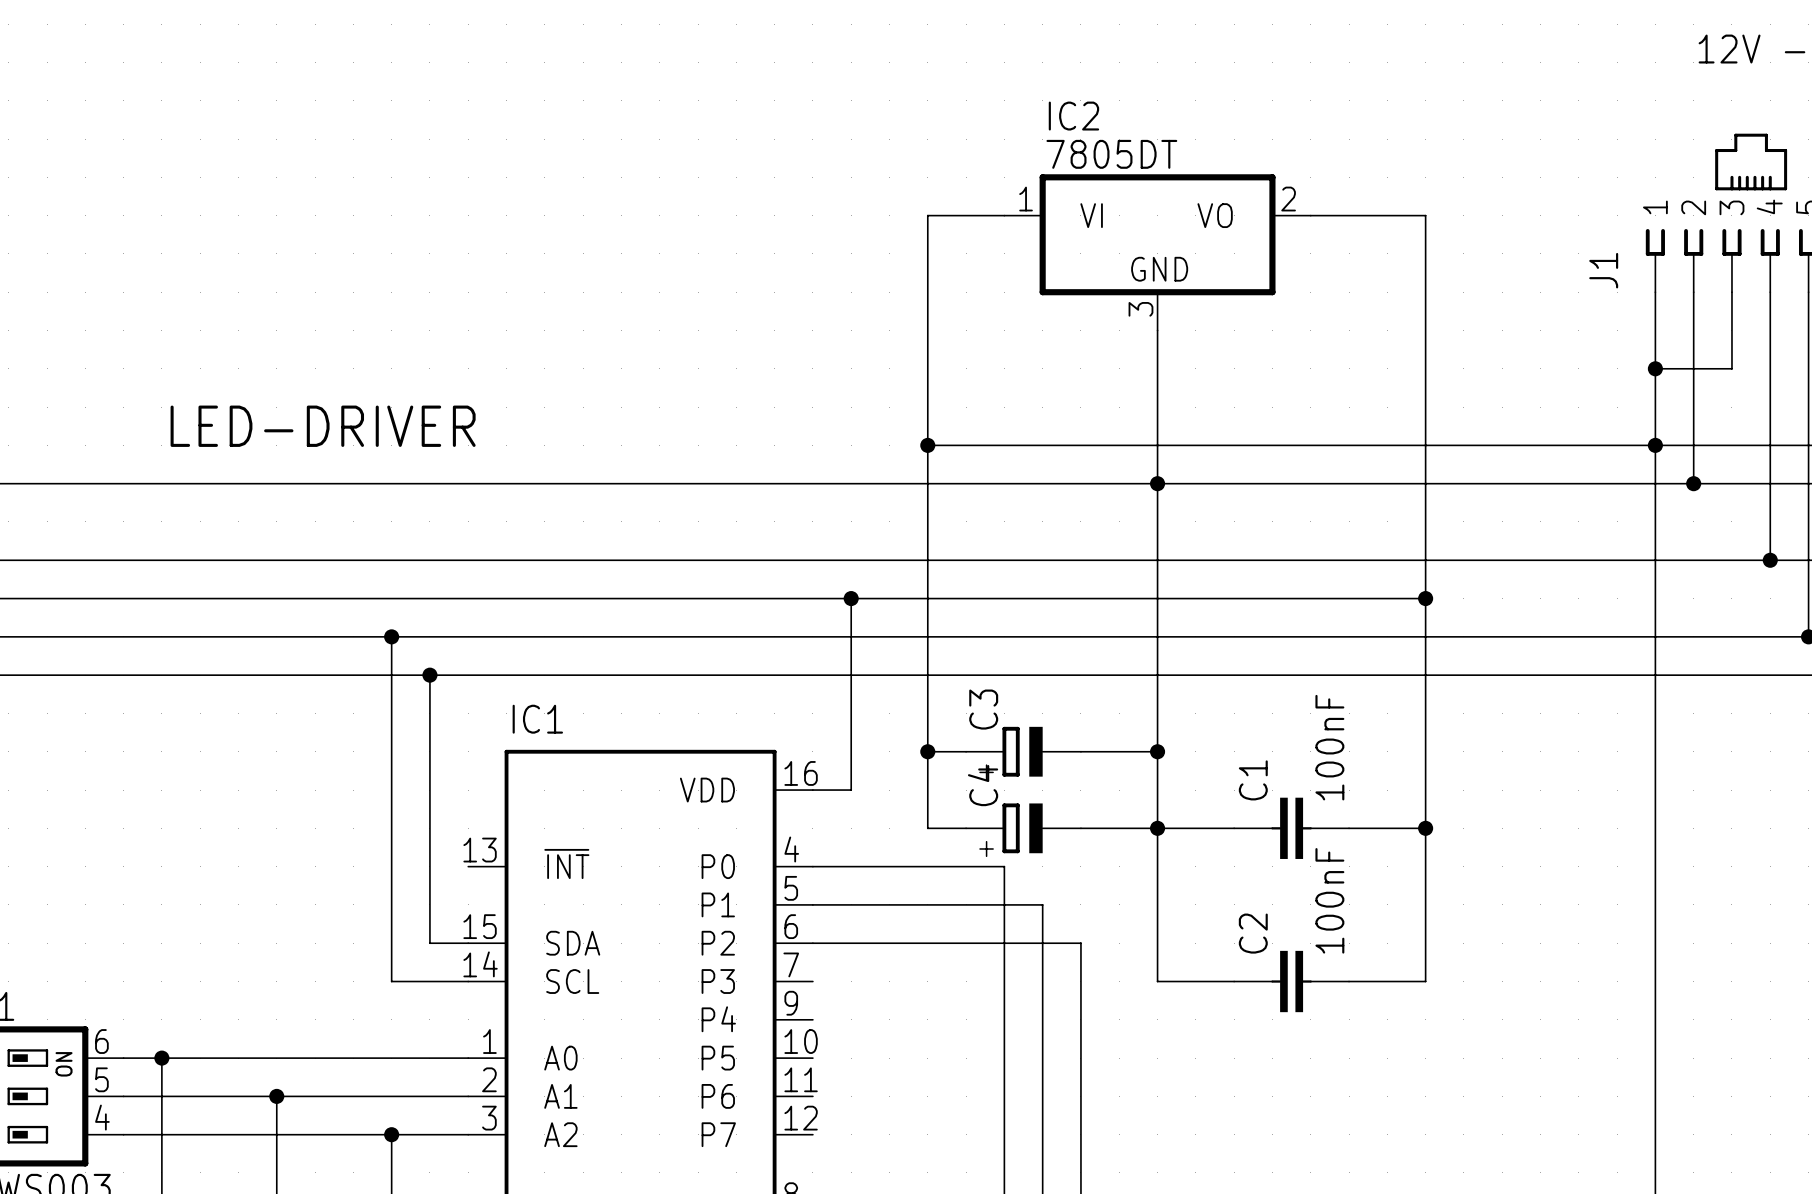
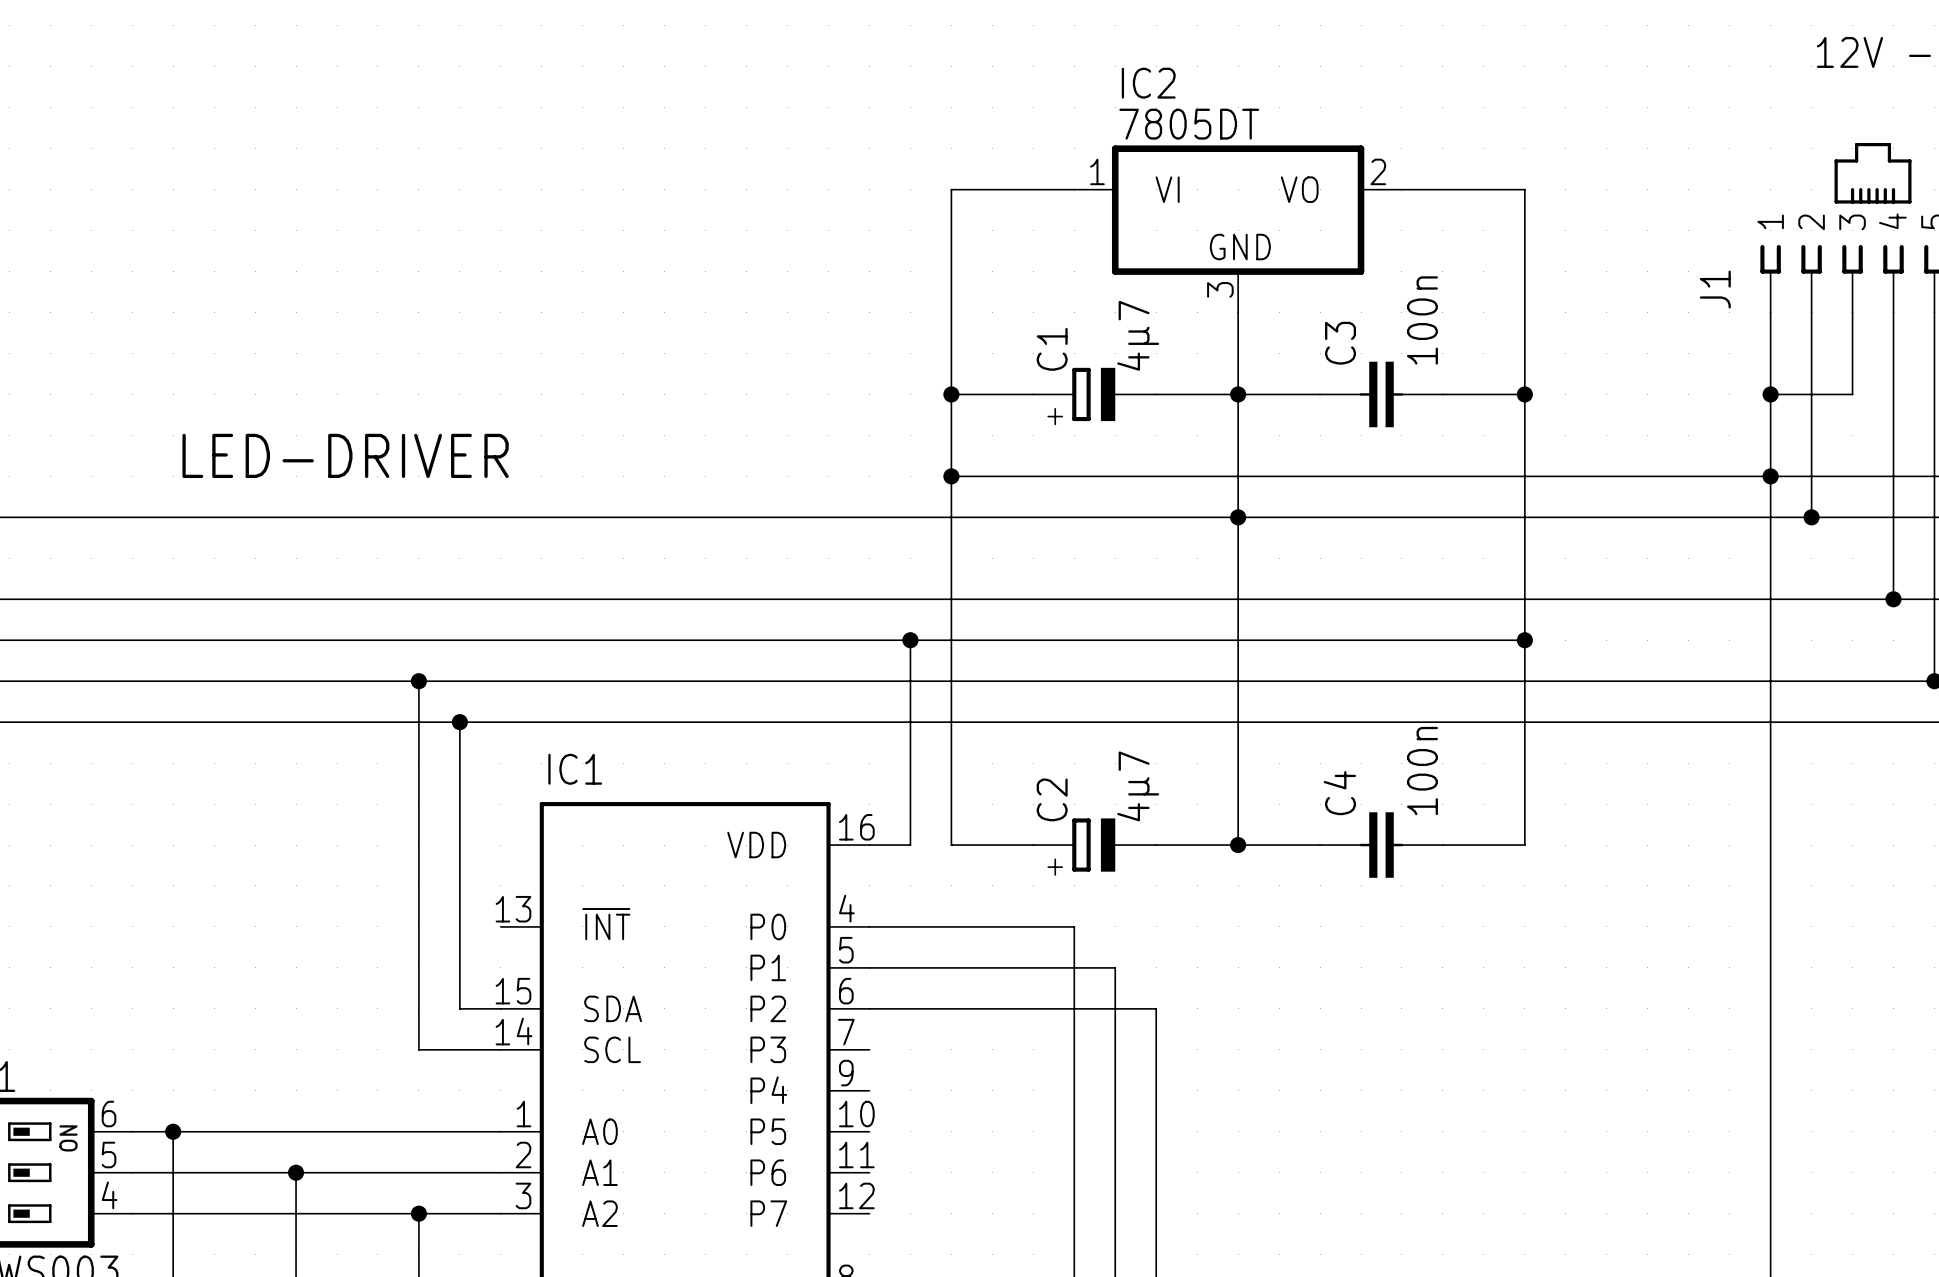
wire: none -> (1074, 189) (951, 189) (951, 845) (1033, 845)
wire: (1004, 215) (927, 215) (927, 828) (966, 828) -> none
wire: (1310, 215) (1425, 215) -> (1401, 189) (1524, 189) (1524, 230)
IC2 position: (1157, 252) -> (1238, 228)
C3 value: none -> 100n (1422, 320)
wire: none -> (951, 394) (1033, 394)
junction: none -> (951, 394)
wire: none -> (1156, 394) (1320, 394)
junction: none -> (1238, 394)
wire: none -> (1442, 394) (1524, 394)
junction: none -> (1524, 394)
junction position: (927, 445) -> (951, 476)
C4 value: none -> 100n (1422, 771)
C3 symbol: [966, 726, 1081, 777] -> [1320, 361, 1443, 428]
C1 value: 100nF (1329, 747) -> 4µ7 (1138, 335)
wire: (927, 751) (966, 751) -> (951, 476) (992, 476)
junction: (927, 751) -> none
wire: (1080, 751) (1157, 751) -> none
junction: (1157, 751) -> none
wire: (1157, 790) (1157, 981) (1234, 981) -> none
junction: none -> (1238, 845)
wire: (1425, 790) (1425, 981) (1349, 981) -> (1524, 845) (1442, 845)
C1 symbol: [1234, 797, 1350, 859] -> [1033, 367, 1157, 422]
C4 symbol: [966, 803, 1081, 854] -> [1320, 812, 1443, 878]
wire: (1080, 828) (1234, 828) -> (1156, 845) (1320, 845)
junction: (1157, 828) -> none
wire: (1349, 828) (1425, 828) -> none
junction: (1425, 828) -> none
C2 value: 100nF (1329, 900) -> 4µ7 (1138, 786)
C2 symbol: [1234, 950, 1350, 1013] -> [1033, 818, 1157, 872]

